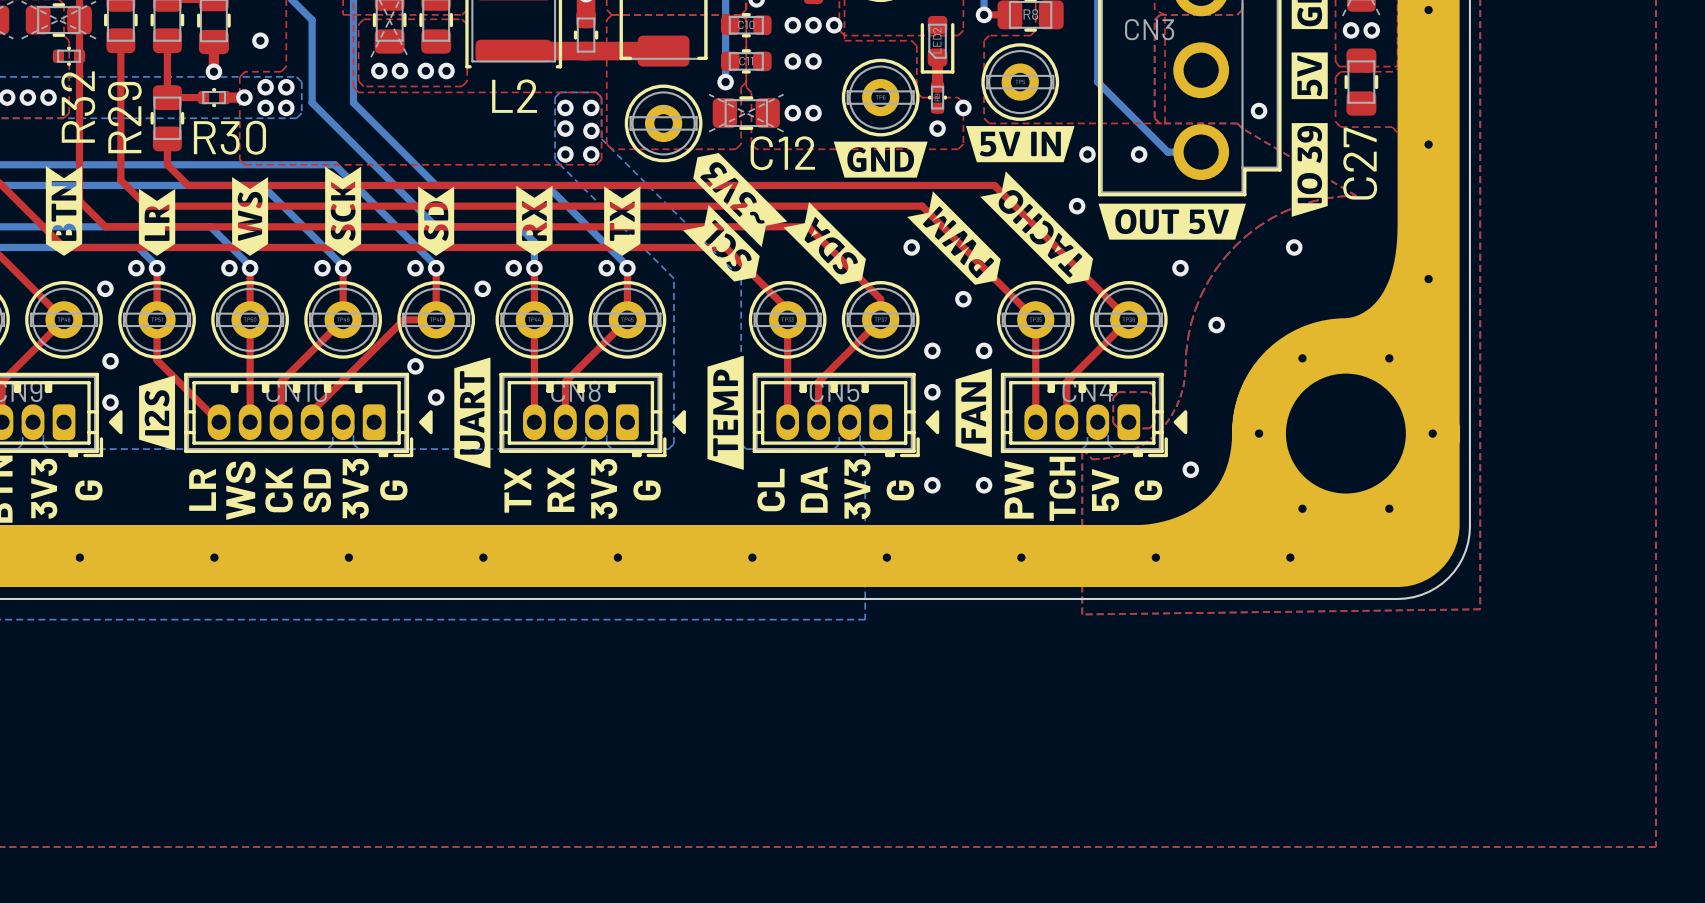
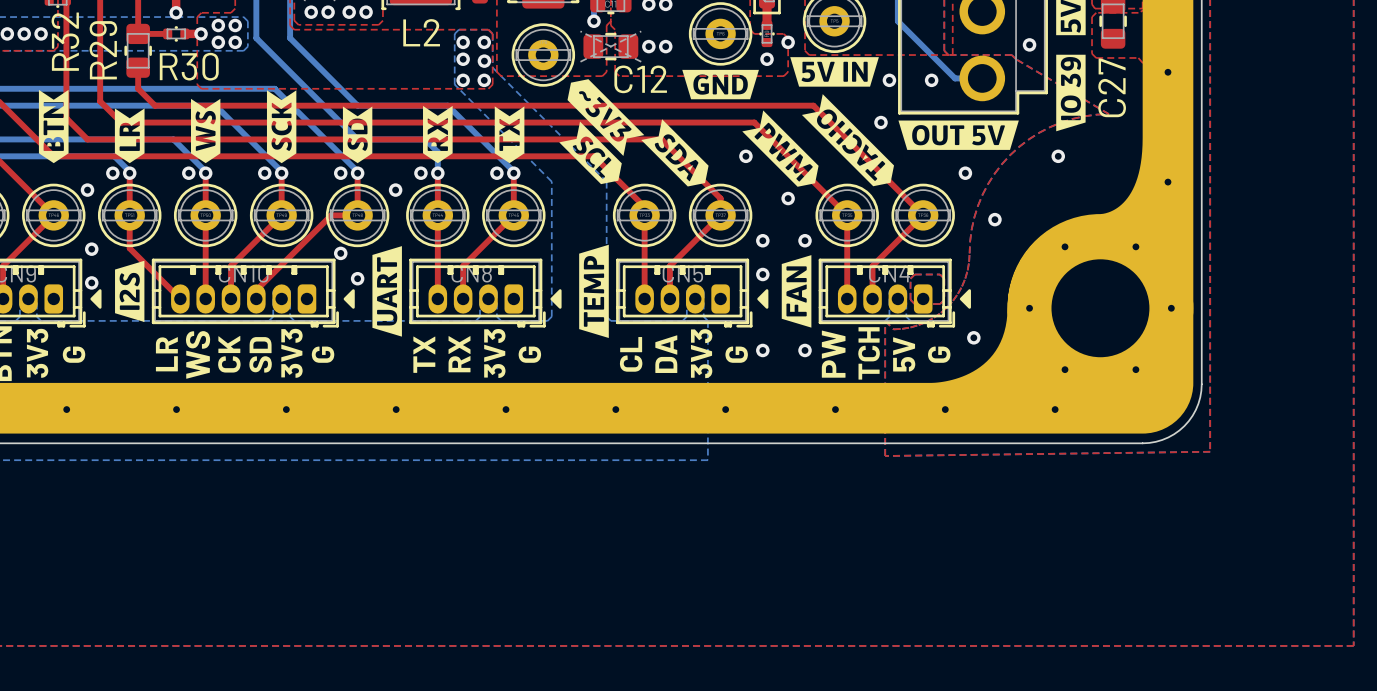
drawing shape: [693, 153, 788, 248] -> [567, 79, 645, 156]
drawing shape: [907, 191, 1001, 285] -> [742, 110, 819, 187]
drawing shape: [783, 202, 866, 285] -> [641, 119, 709, 187]
drawing shape: [683, 204, 760, 282] -> [559, 121, 622, 185]

